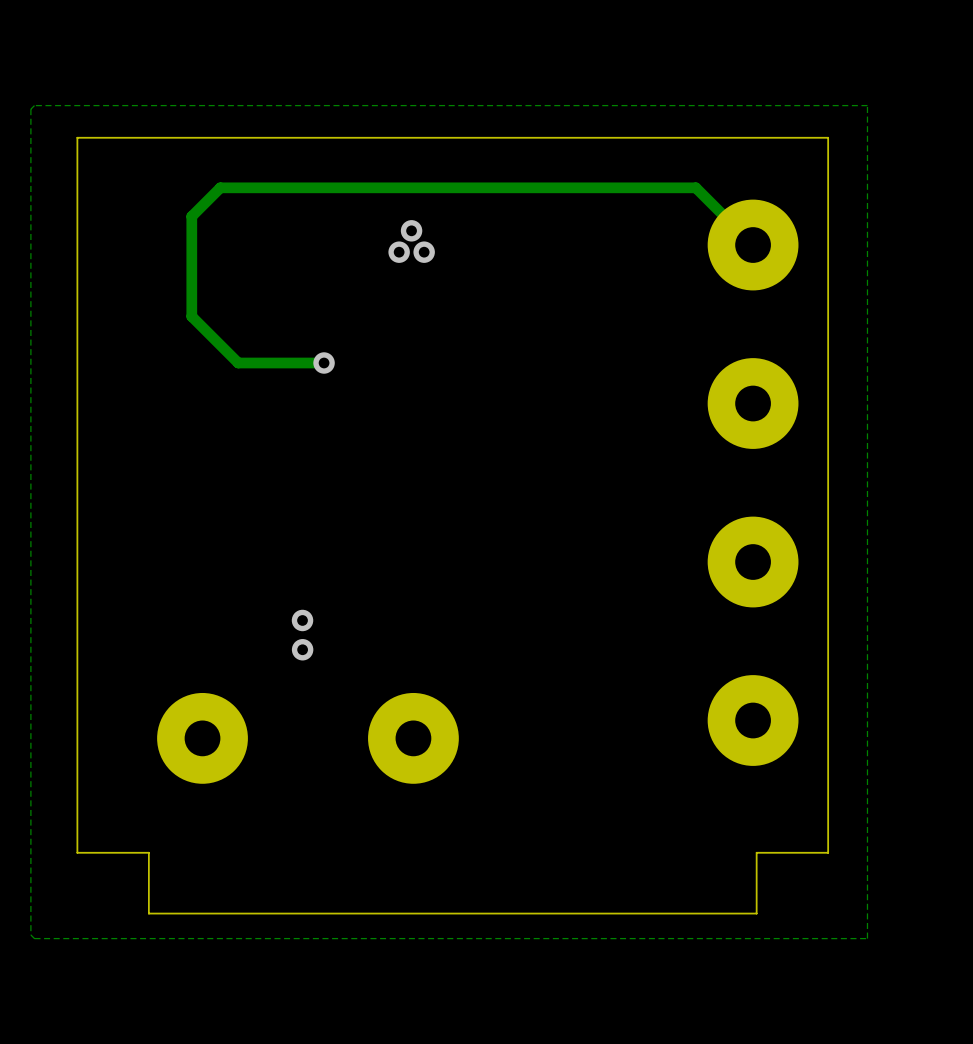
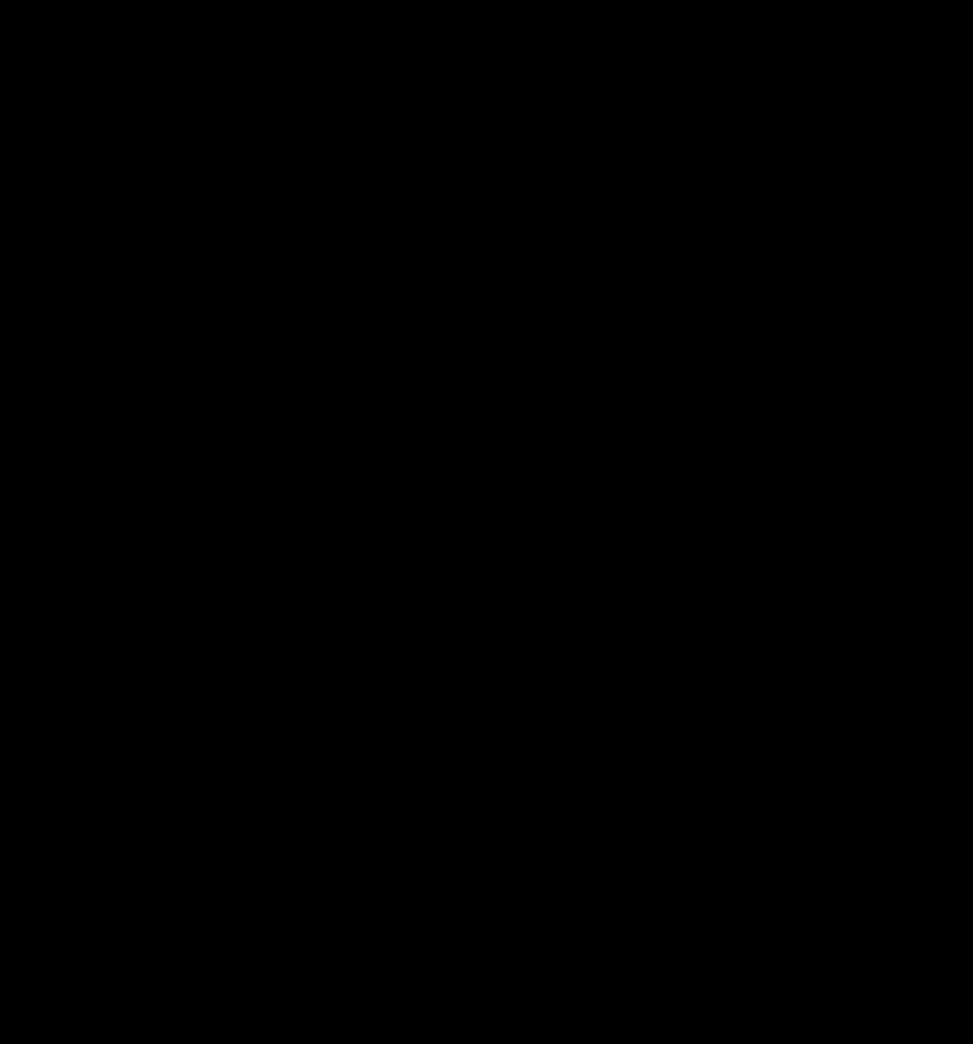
zone outline: (867, 105) (34, 105) (30, 109) (30, 935) (34, 938) (867, 938) (867, 105) -> none
board edge: (828, 137) (77, 137) (77, 852) (148, 852) (148, 913) (756, 913) (756, 852) (828, 852) (828, 137) -> none
via: (411, 230) -> none
track: (753, 245) (695, 187) (220, 187) (191, 216) (191, 316) (238, 363) (324, 363) -> none
part: (753, 245) -> none
via: (399, 252) -> none
via: (424, 252) -> none
via: (324, 363) -> none
part: (753, 403) -> none
part: (753, 562) -> none
via: (302, 620) -> none
via: (302, 649) -> none
part: (753, 720) -> none
part: (202, 738) -> none
part: (413, 738) -> none

